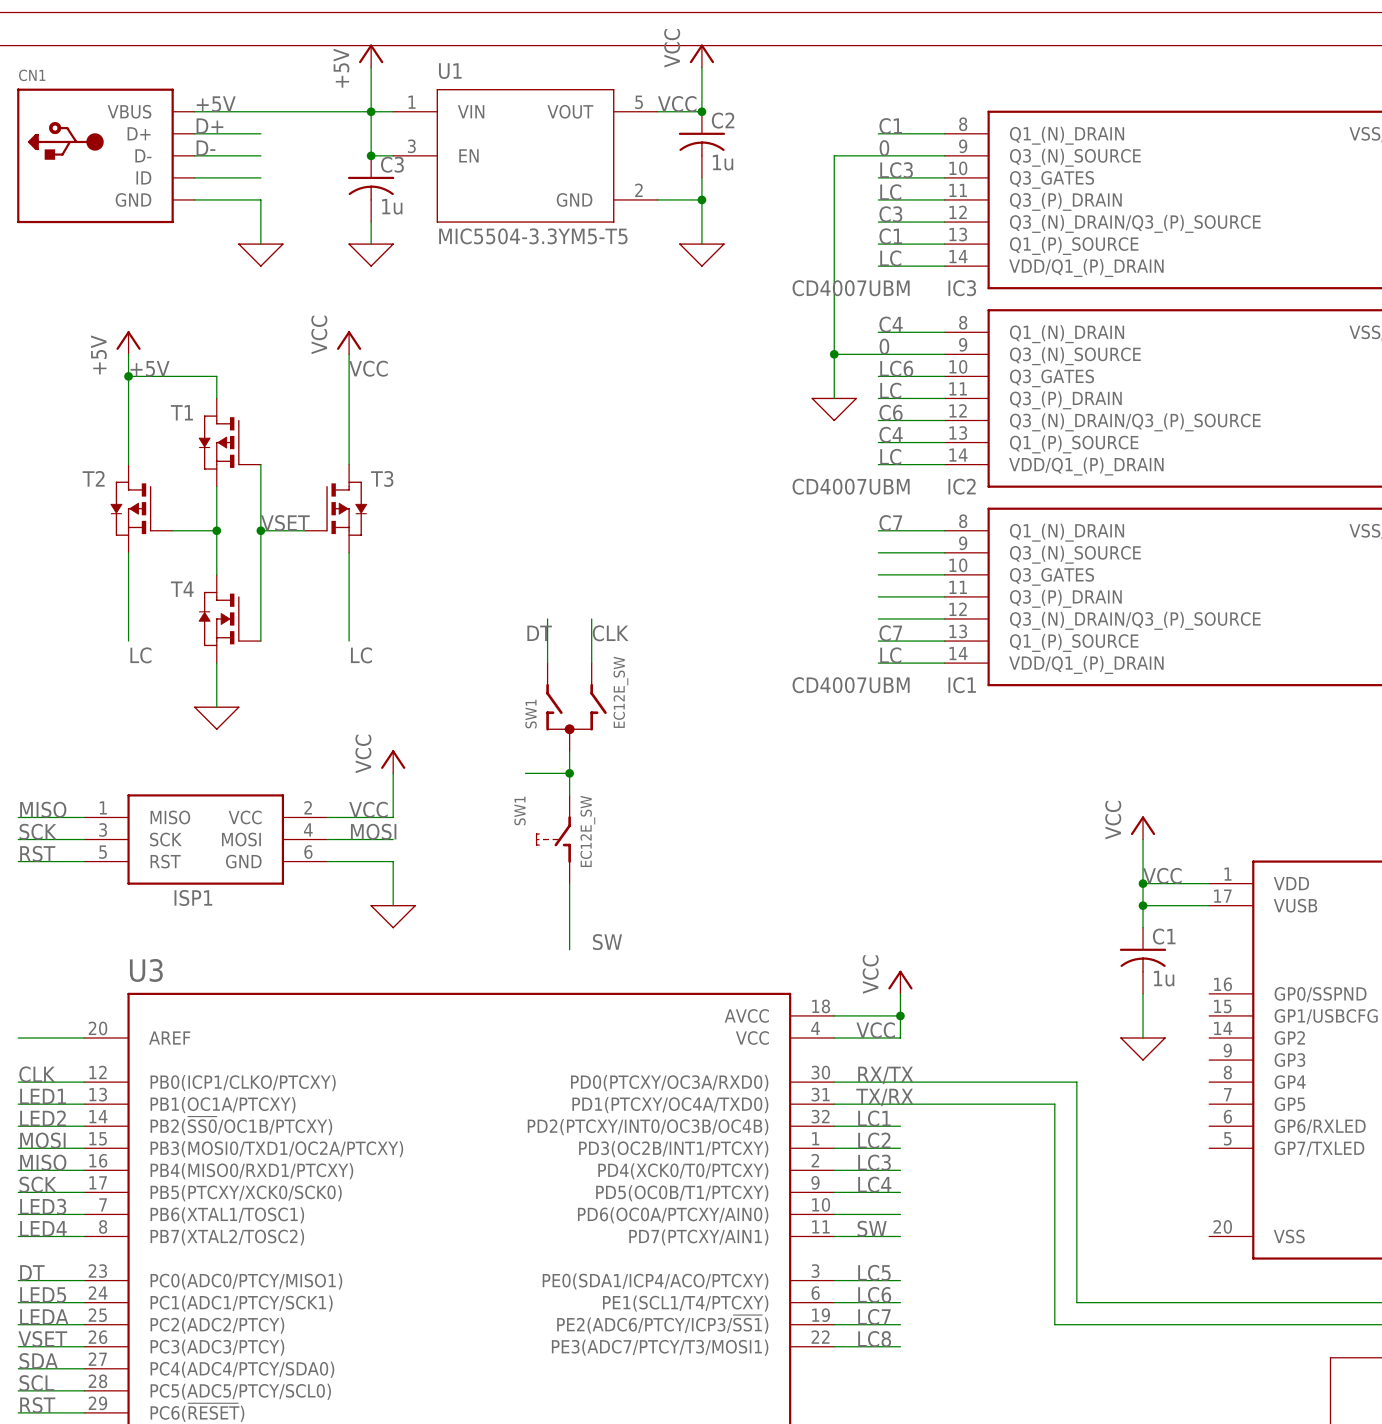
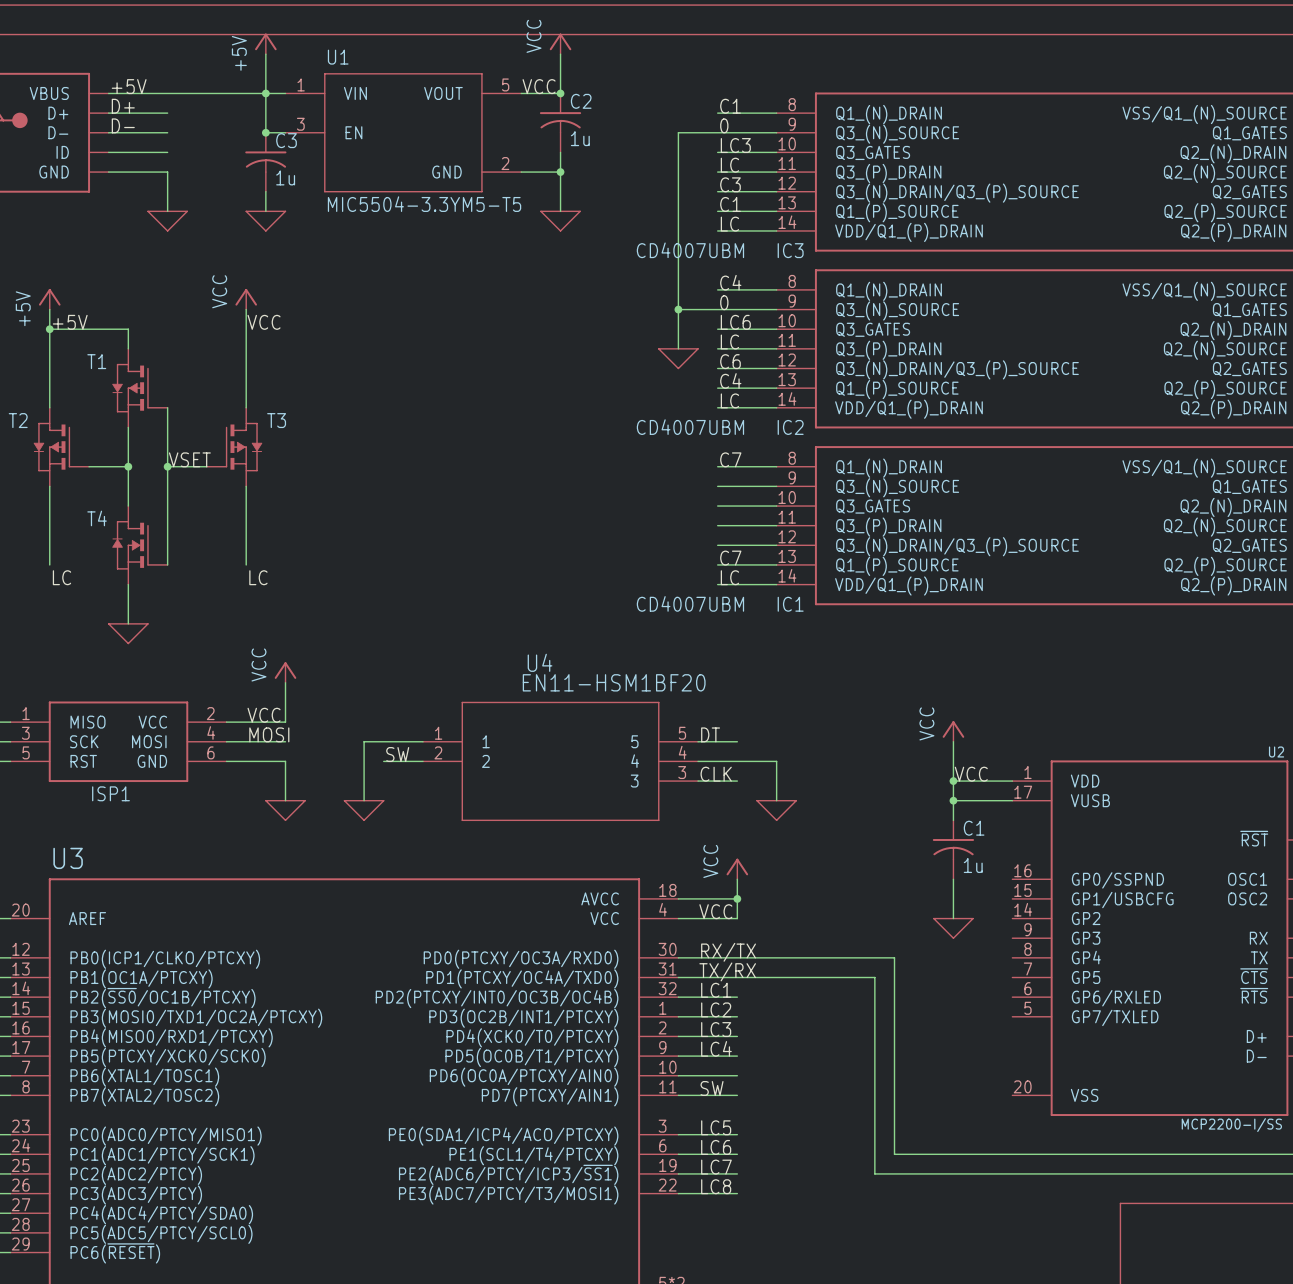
wire: (547, 618) (547, 663) -> none
wire: (591, 618) (591, 663) -> none
label: DT (539, 633) -> none
label: CLK (610, 633) -> none
SW1: EC12E_SW (576, 707) -> none
wire: (569, 751) (569, 795) -> none
wire: (525, 773) (569, 773) -> (383, 761) (423, 761)
junction: (569, 773) -> none
label: none -> DT (710, 734)
wire: none -> (423, 741) (364, 741) (364, 800)
SW1: EC12E_SW (553, 839) -> none
wire: none -> (698, 741) (737, 741)
U4: none -> EN11-HSM1BF20 (560, 761)
wire: none -> (698, 761) (776, 761) (776, 800)
label: none -> CLK (716, 774)
wire: (569, 883) (569, 949) -> none
wire: none -> (698, 781) (737, 781)
power symbol: none -> (364, 810)
power symbol: none -> (776, 810)
label position: SW (607, 942) -> SW (397, 754)

